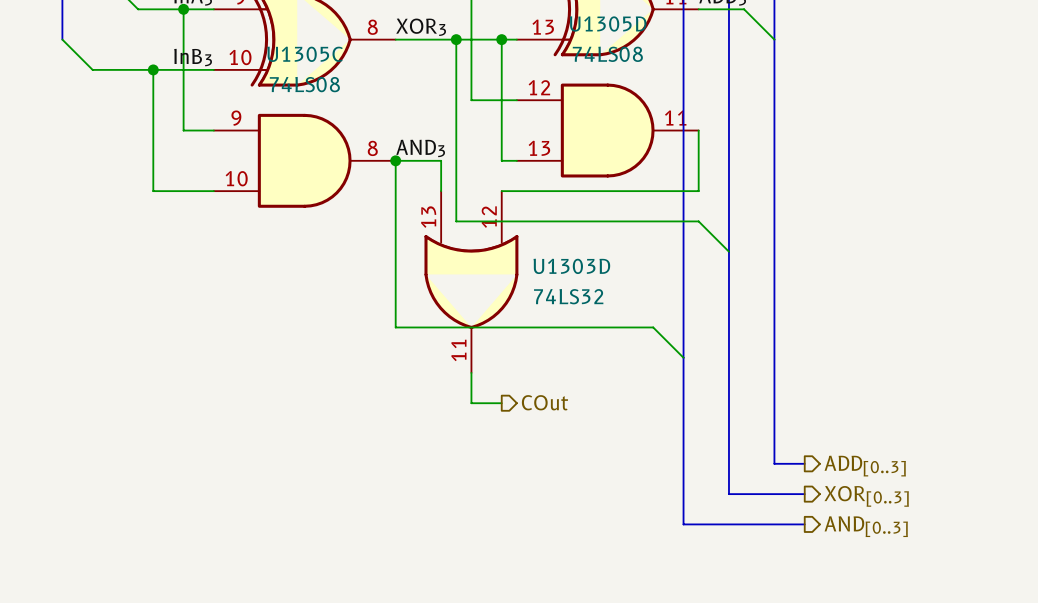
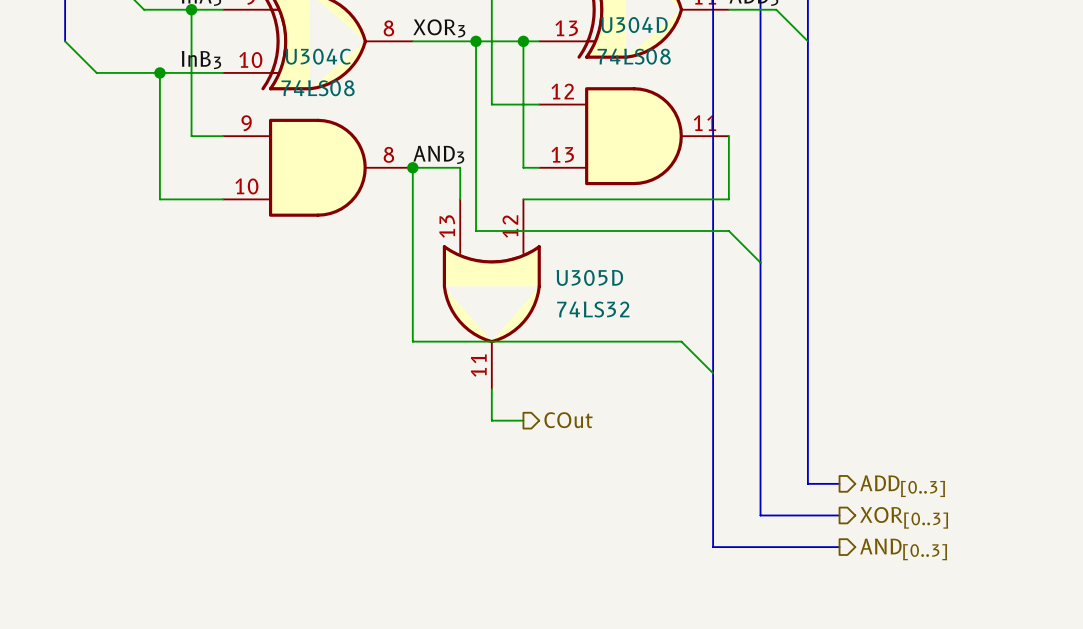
U1305D name: U1305D (608, 24) -> U304D (634, 25)
U1305C name: U1305C (305, 54) -> U304C (318, 56)
U1303D name: U1303D (571, 266) -> U305D (589, 277)

